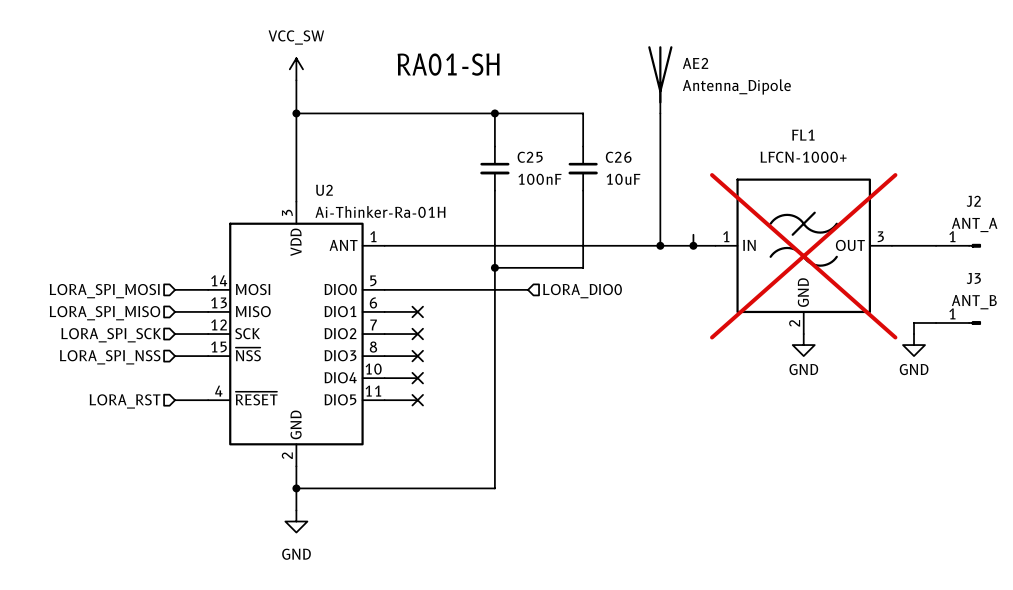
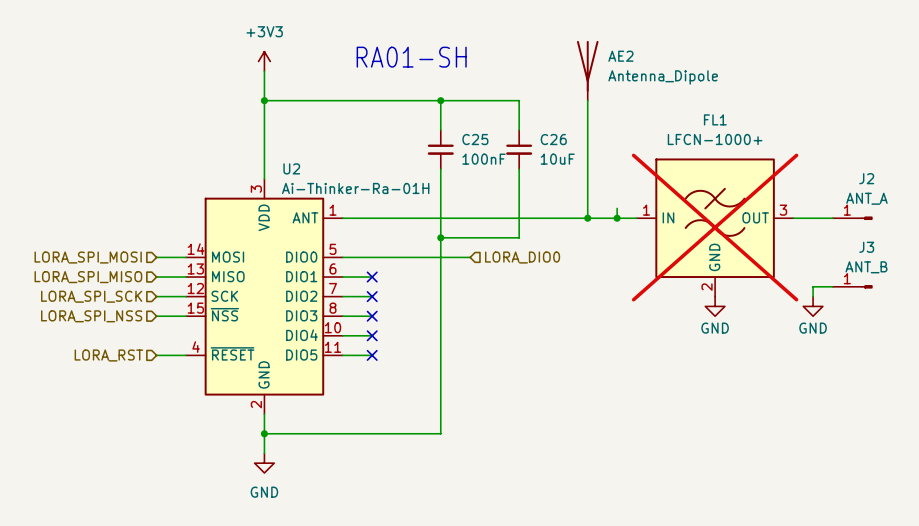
power symbol: VCC_SW (296, 69) -> +3V3 (264, 61)

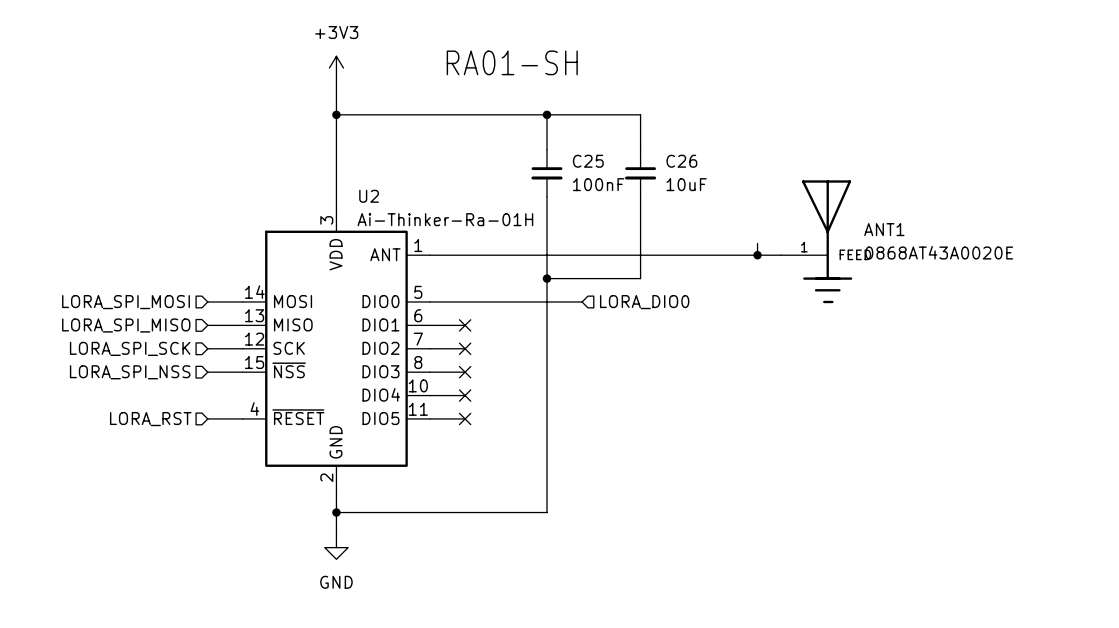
AE2: Antenna_Dipole (587, 70) -> none
wire: (587, 100) (587, 218) -> none
ANT1: none -> 0868AT43A0020E (816, 241)
junction: (587, 218) -> none
wire: (793, 218) (832, 218) -> none
J2: ANT_A (852, 218) -> none
FL1: LFCN-1000+ (715, 227) -> none
wire: (832, 286) (813, 286) (813, 296) -> none
J3: ANT_B (852, 286) -> none
power symbol: GND (715, 306) -> none
power symbol: GND (813, 306) -> none

